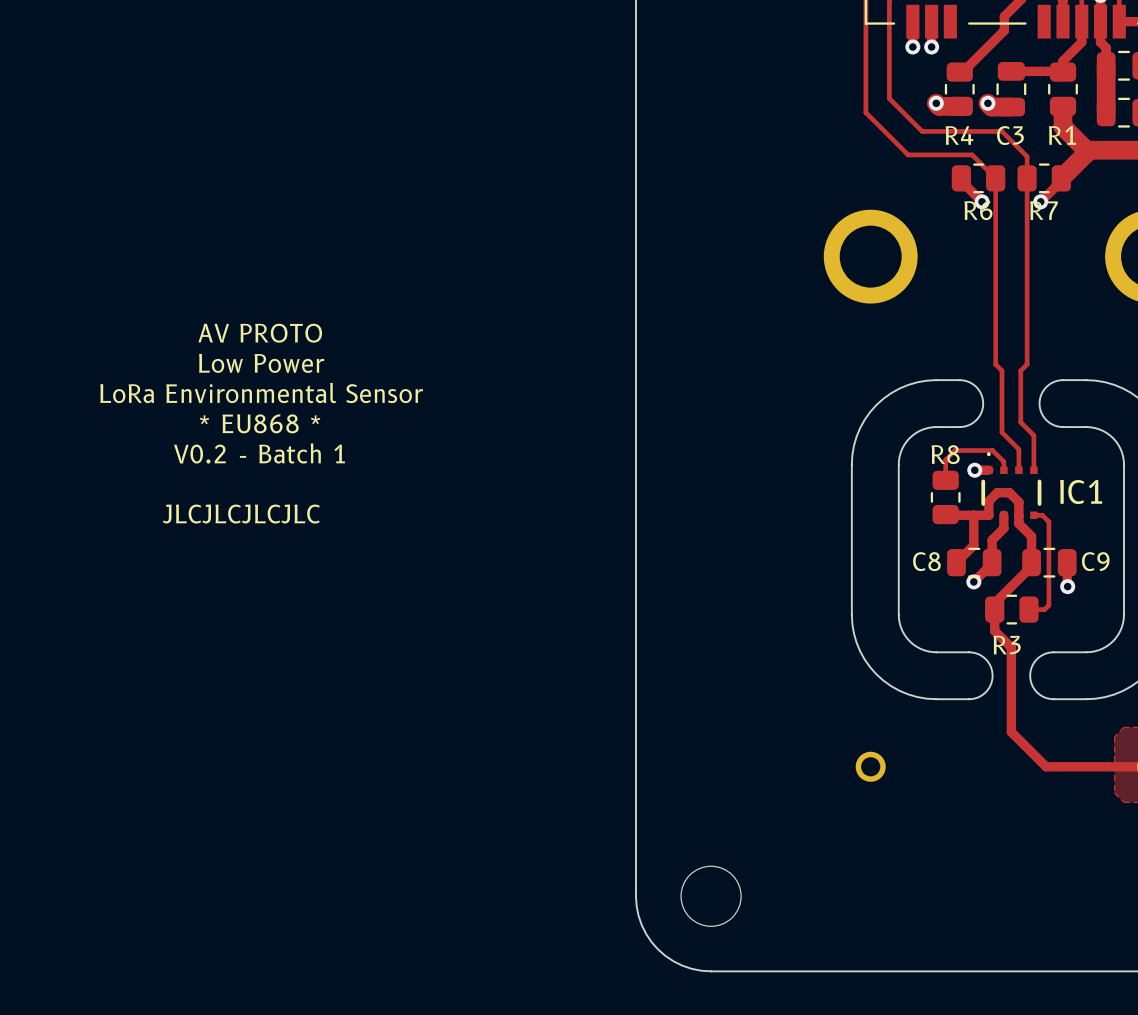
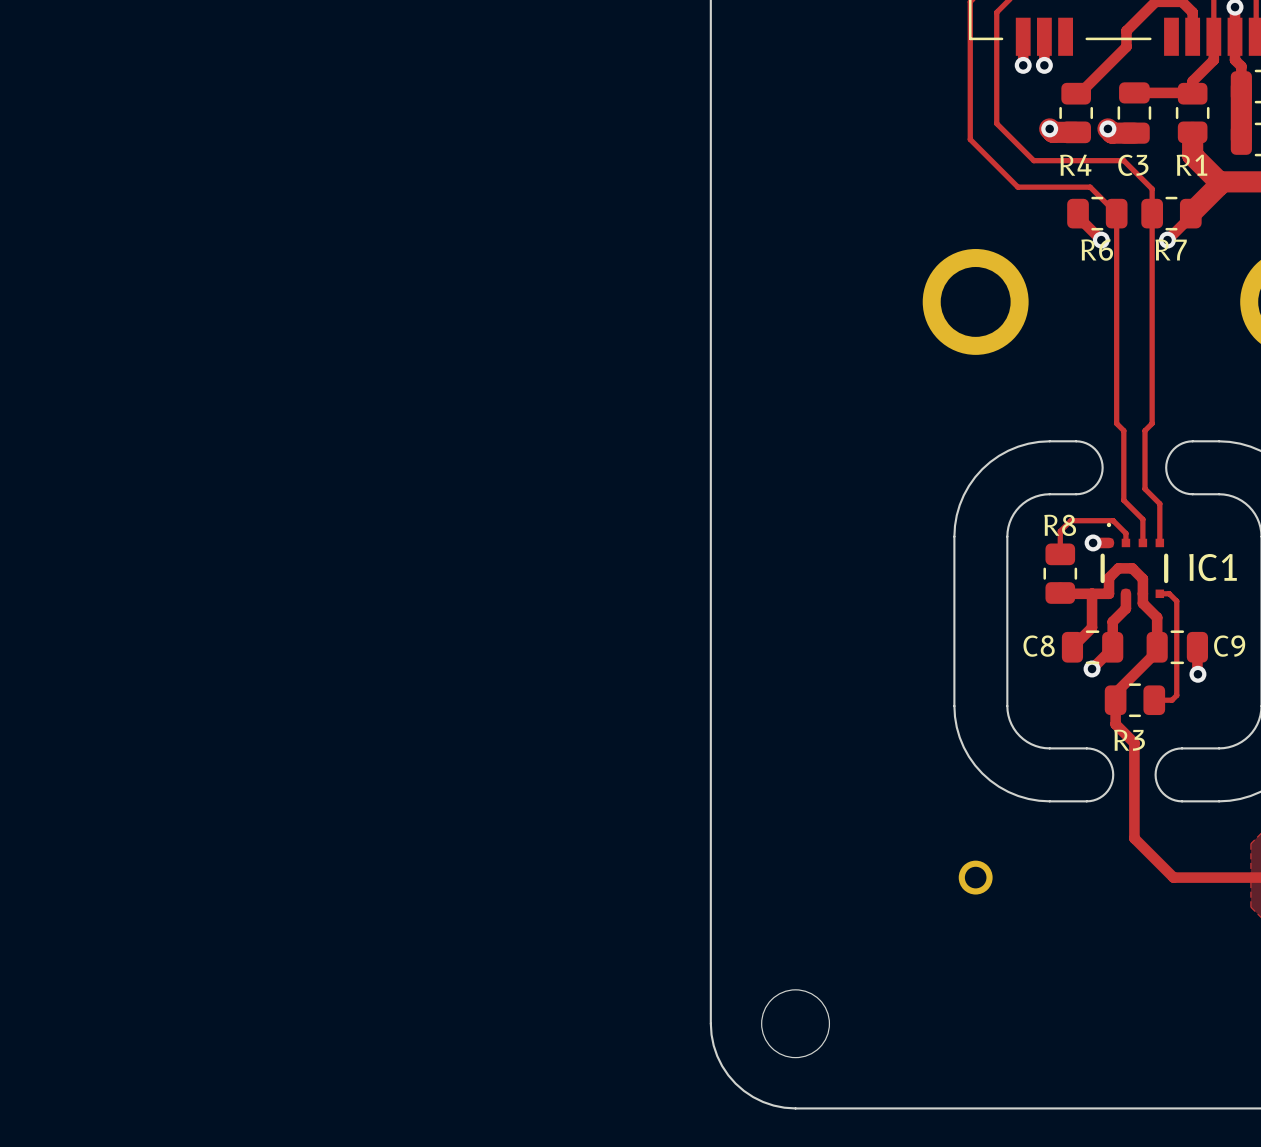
text: AV PROTO (260, 333) -> none
text: Low Power (261, 363) -> none
text: LoRa Environmental Sensor (261, 393) -> none
text: * EU868 * (260, 423) -> none
text: V0.2 - Batch 1 (259, 453) -> none
text: JLCJLCJLCJLC (241, 514) -> none

